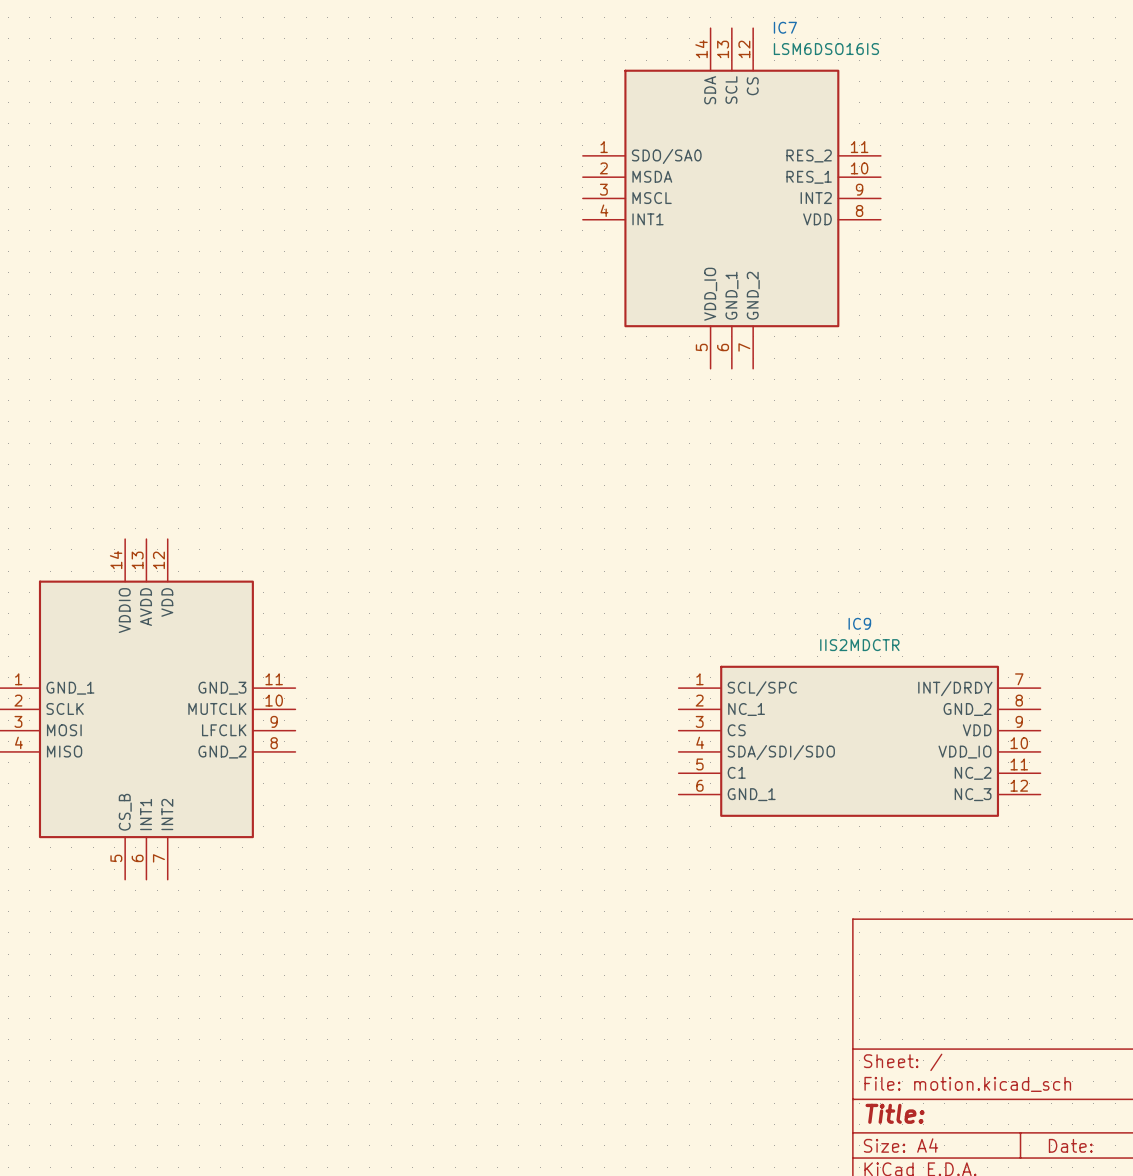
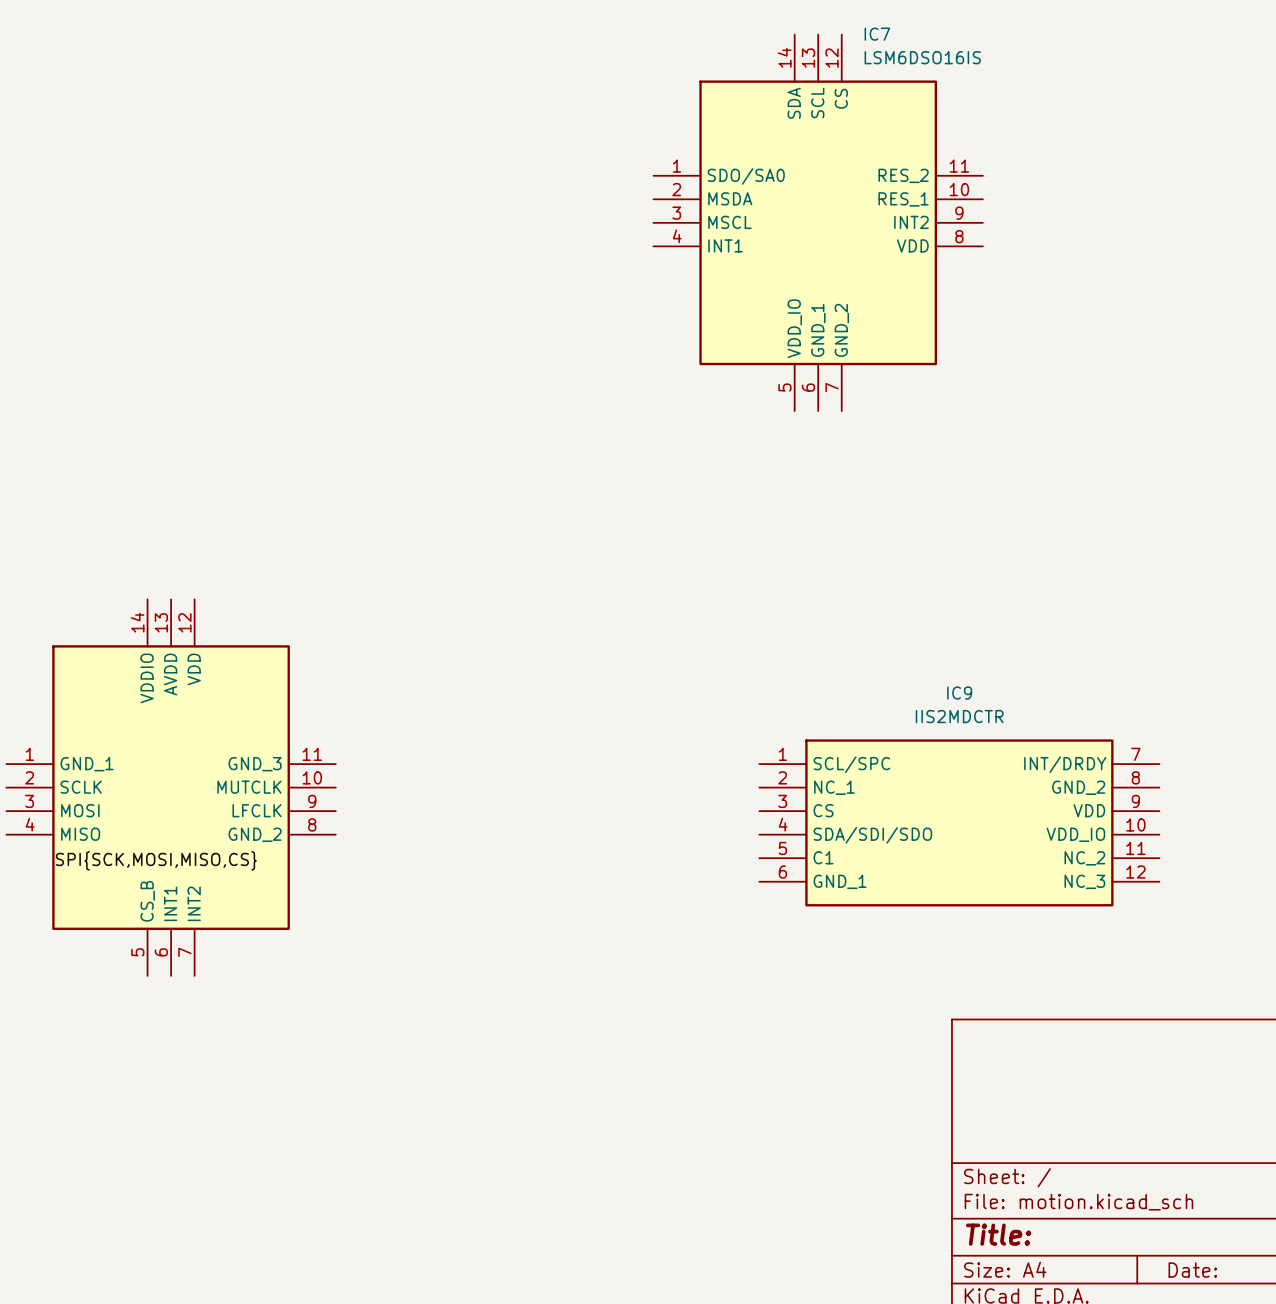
label: none -> SPI{SCK,MOSI,MISO,CS} (156, 860)

